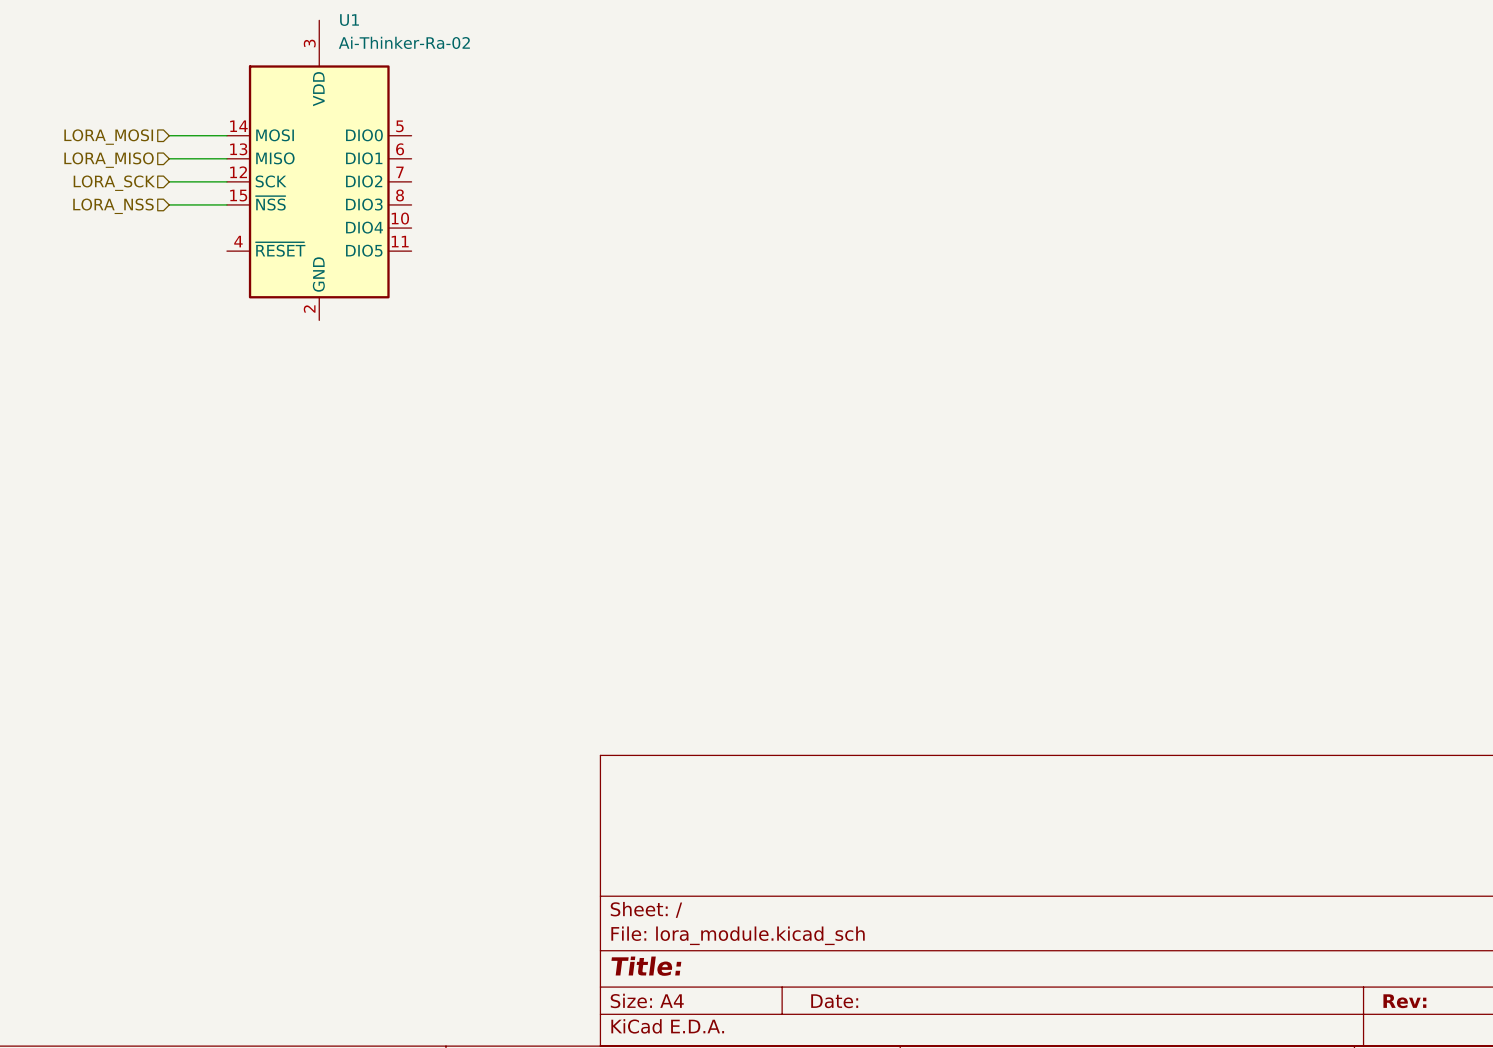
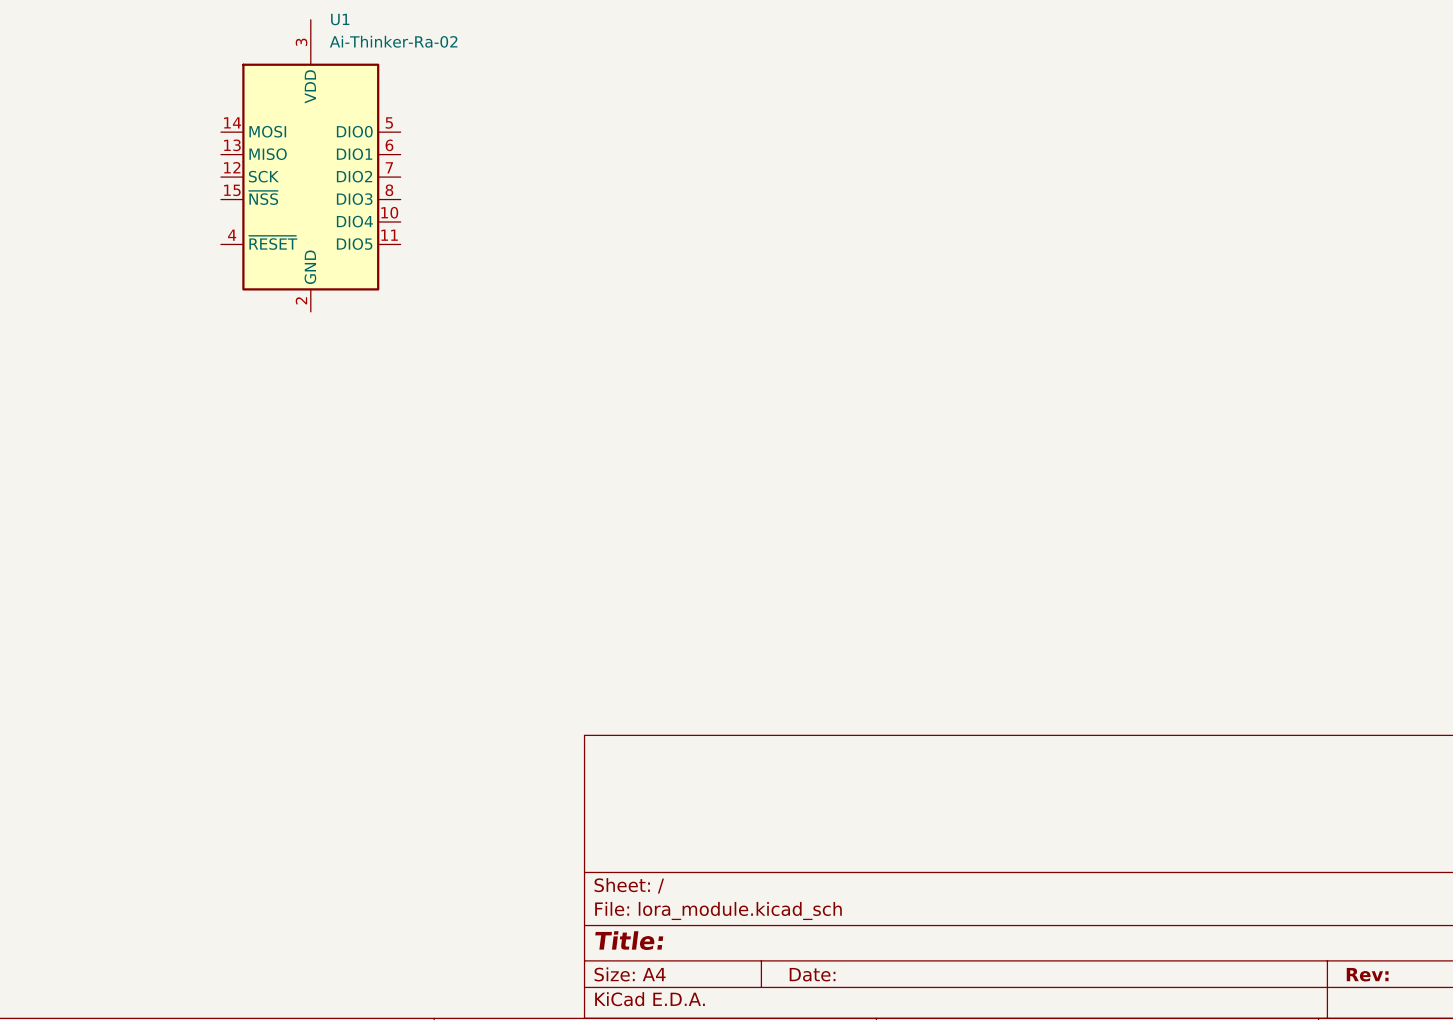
wire: (169, 135) (226, 135) -> none
hierarchical label: LORA_MOSI (108, 137) -> none
wire: (169, 158) (226, 158) -> none
hierarchical label: LORA_MISO (109, 160) -> none
wire: (169, 181) (226, 181) -> none
hierarchical label: LORA_SCK (114, 183) -> none
wire: (169, 204) (226, 204) -> none
hierarchical label: LORA_NSS (113, 206) -> none

